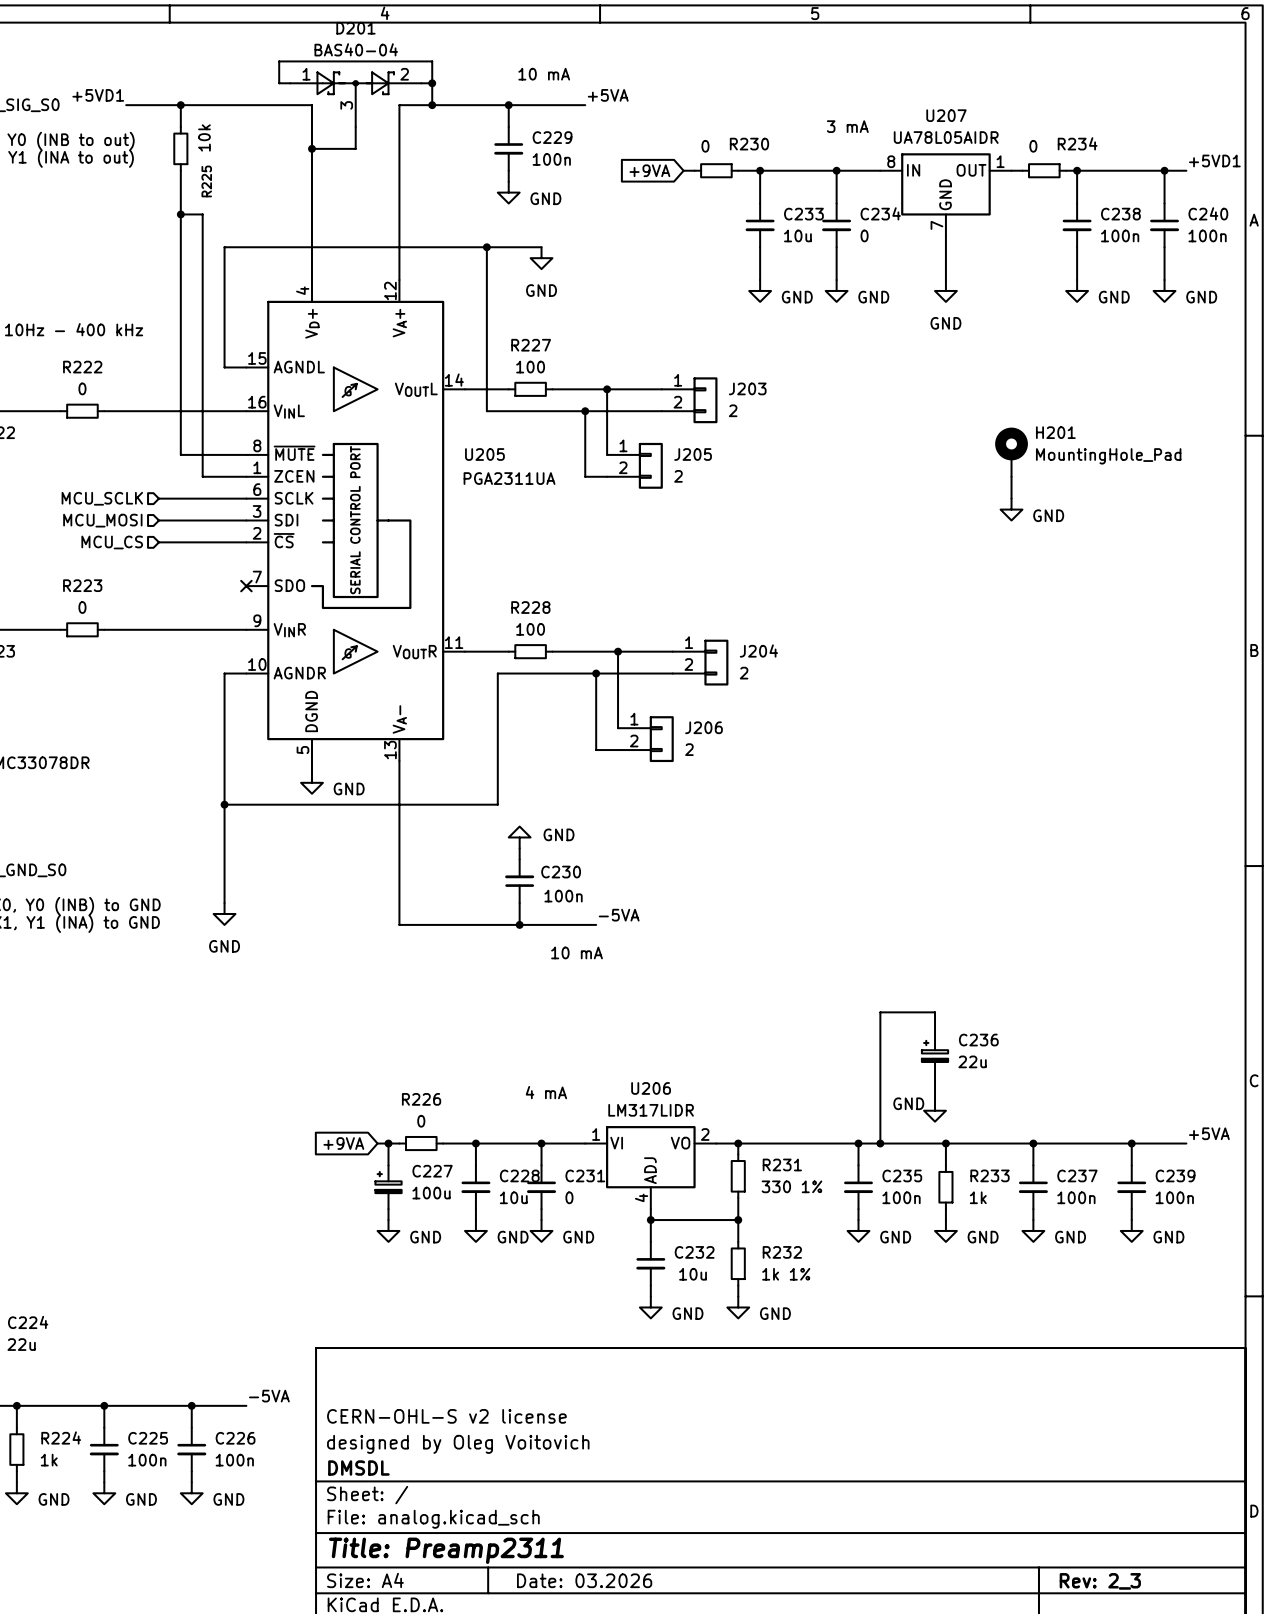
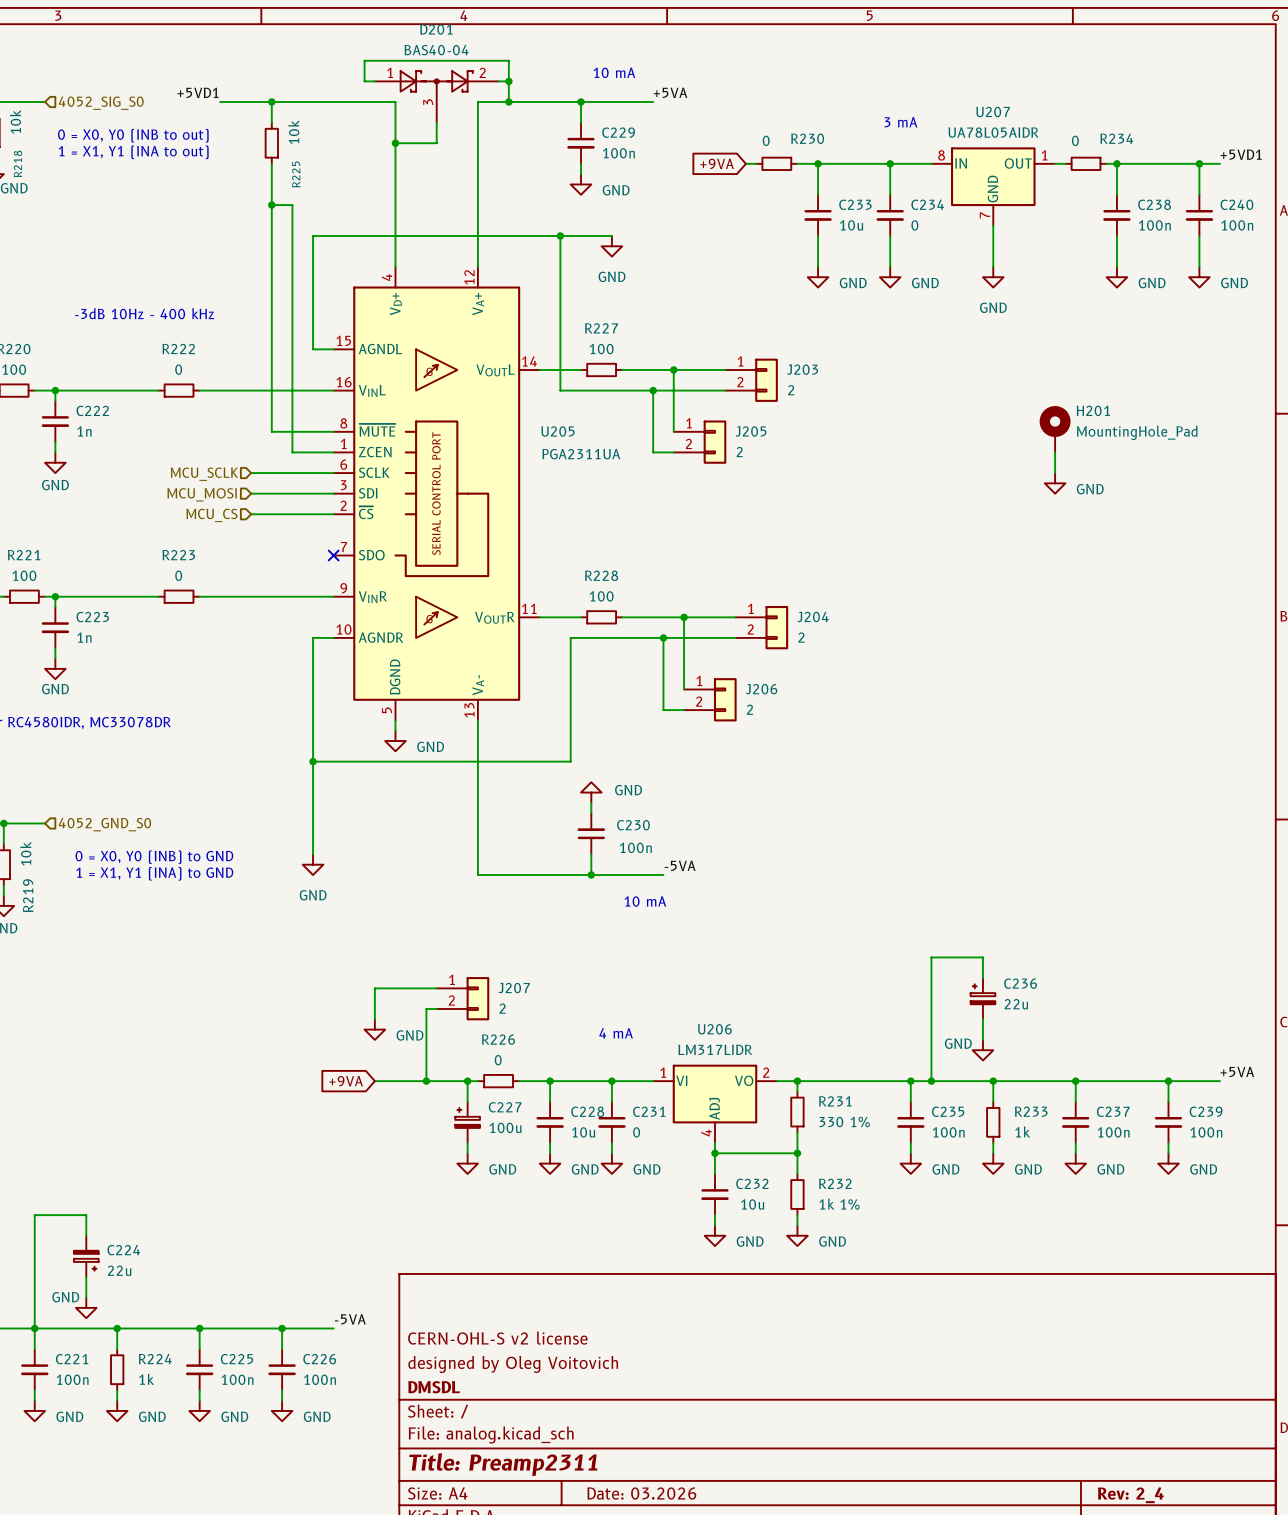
wire: none -> (436, 988) (374, 988) (374, 1019)
J207: none -> 2 (462, 998)
wire: none -> (436, 1008) (426, 1008) (426, 1081)
power symbol: none -> GND (374, 1029)
wire: none -> (374, 1081) (457, 1081)
global label position: +9VA (343, 1143) -> +9VA (346, 1081)
junction: none -> (426, 1081)
title block: Rev: 2_3 (1100, 1581) -> Rev: 2_4 (1130, 1495)

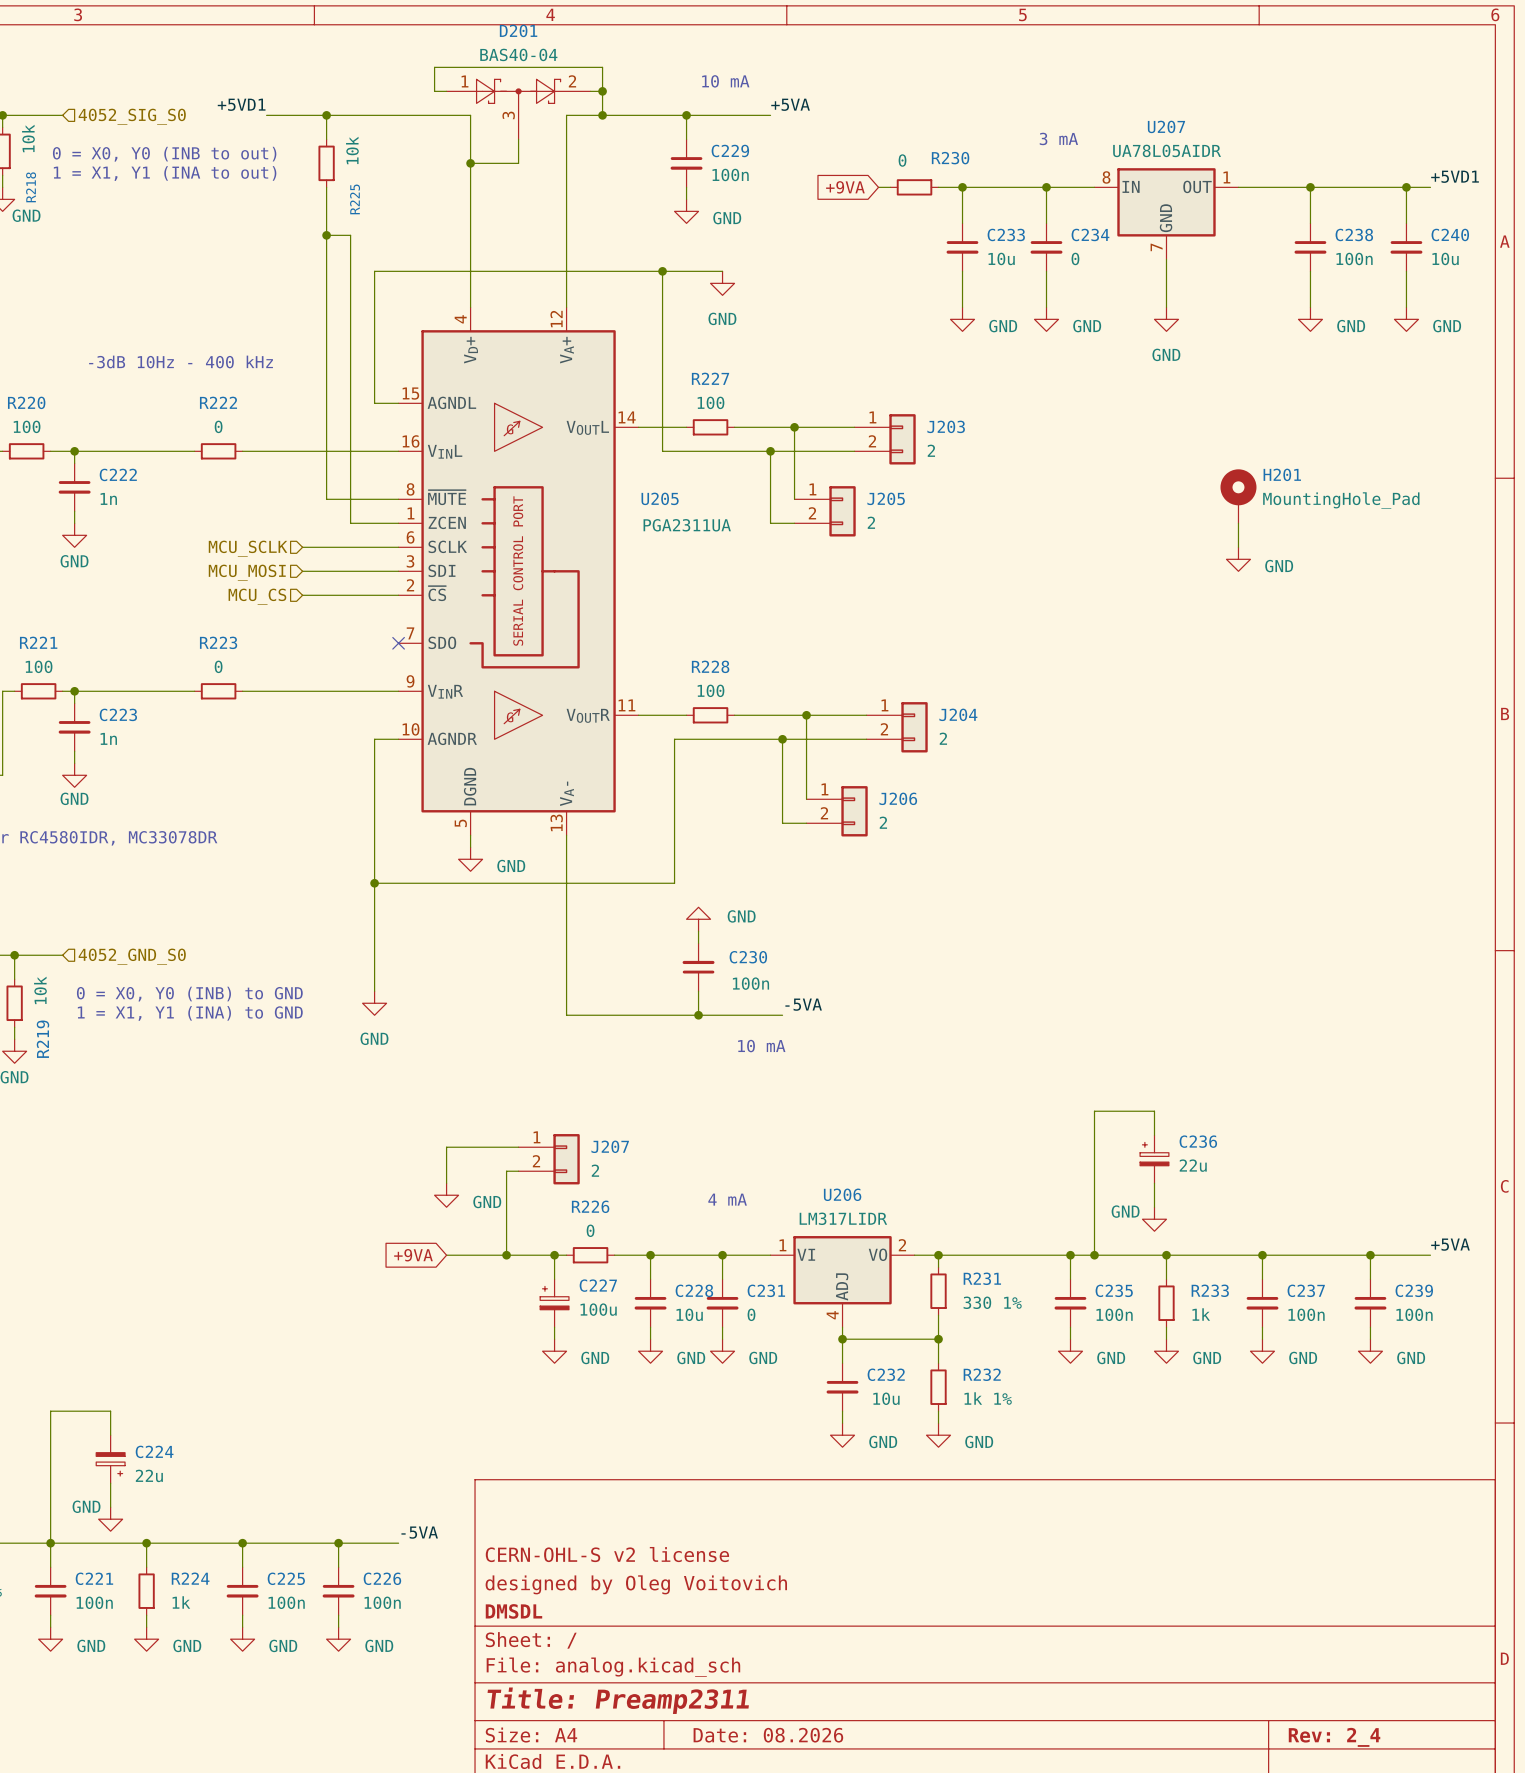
wire: none -> (1250, 187) (1298, 187)
R234: 0 (1086, 163) -> none
C240 value: 100n (1237, 225) -> 10u (1445, 258)
title block: Date: 03.2026 (641, 1493) -> Date: 08.2026 (768, 1735)

